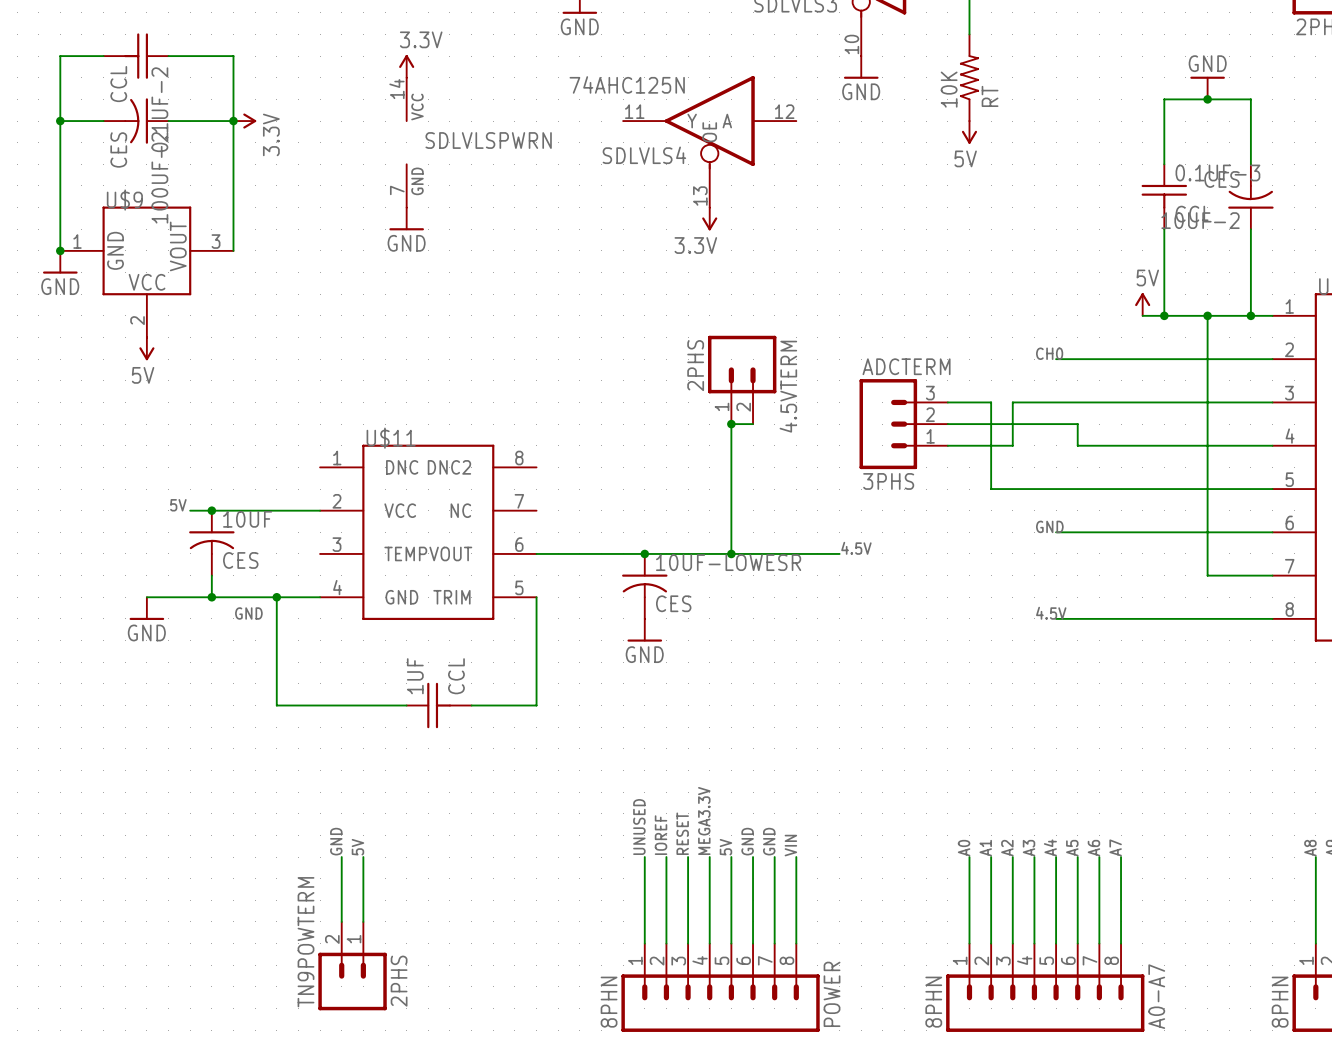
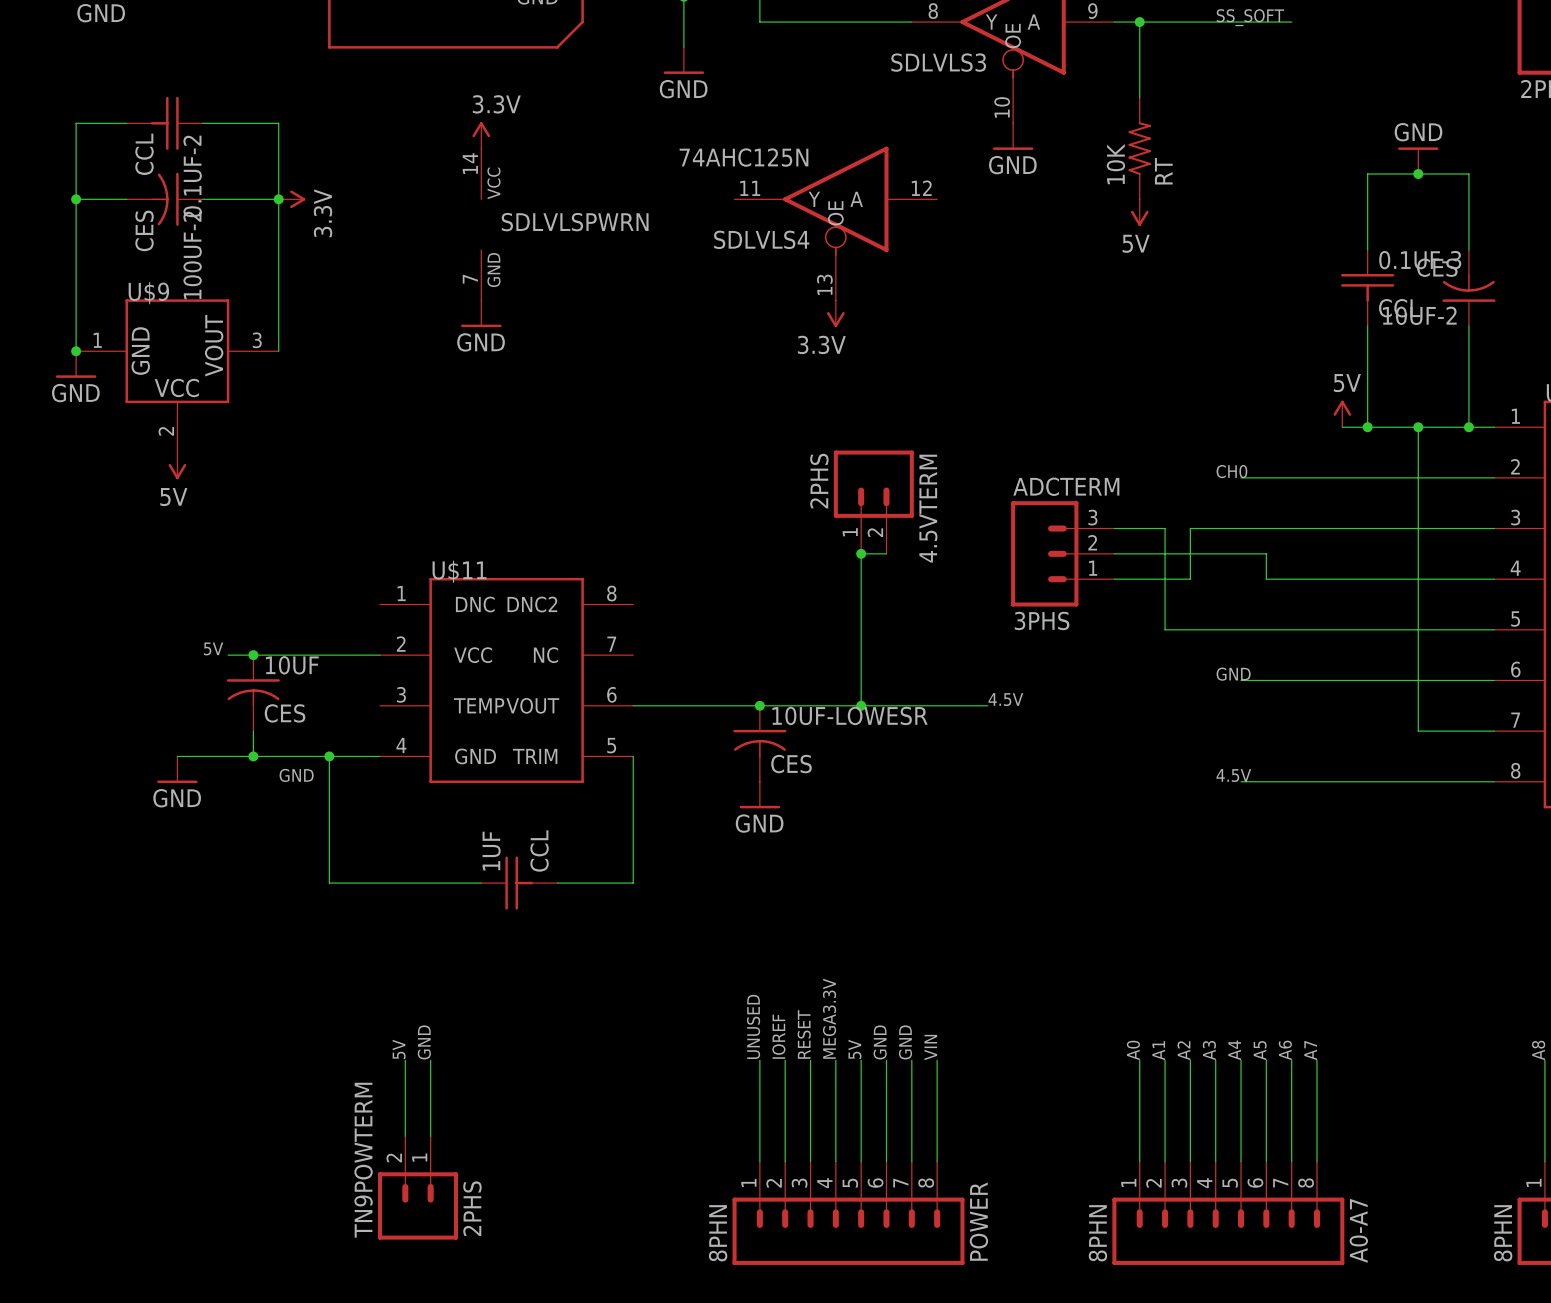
label: GND (336, 841) -> 5V (399, 1049)
label: 5V (357, 847) -> GND (424, 1042)

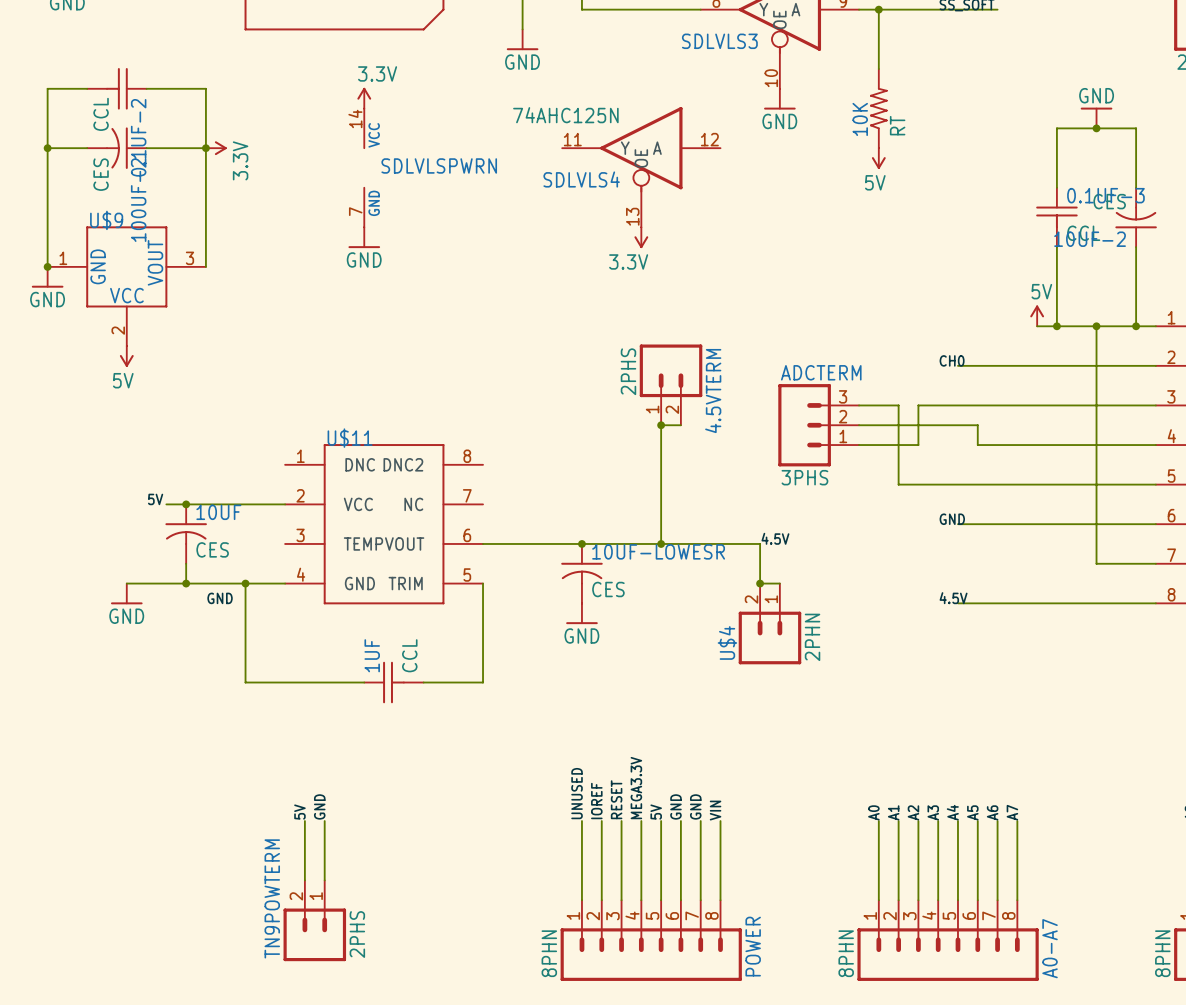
wire: none -> (760, 543) (760, 583) (779, 583)
junction: none -> (760, 583)
U$4: none -> 2PHN (769, 623)

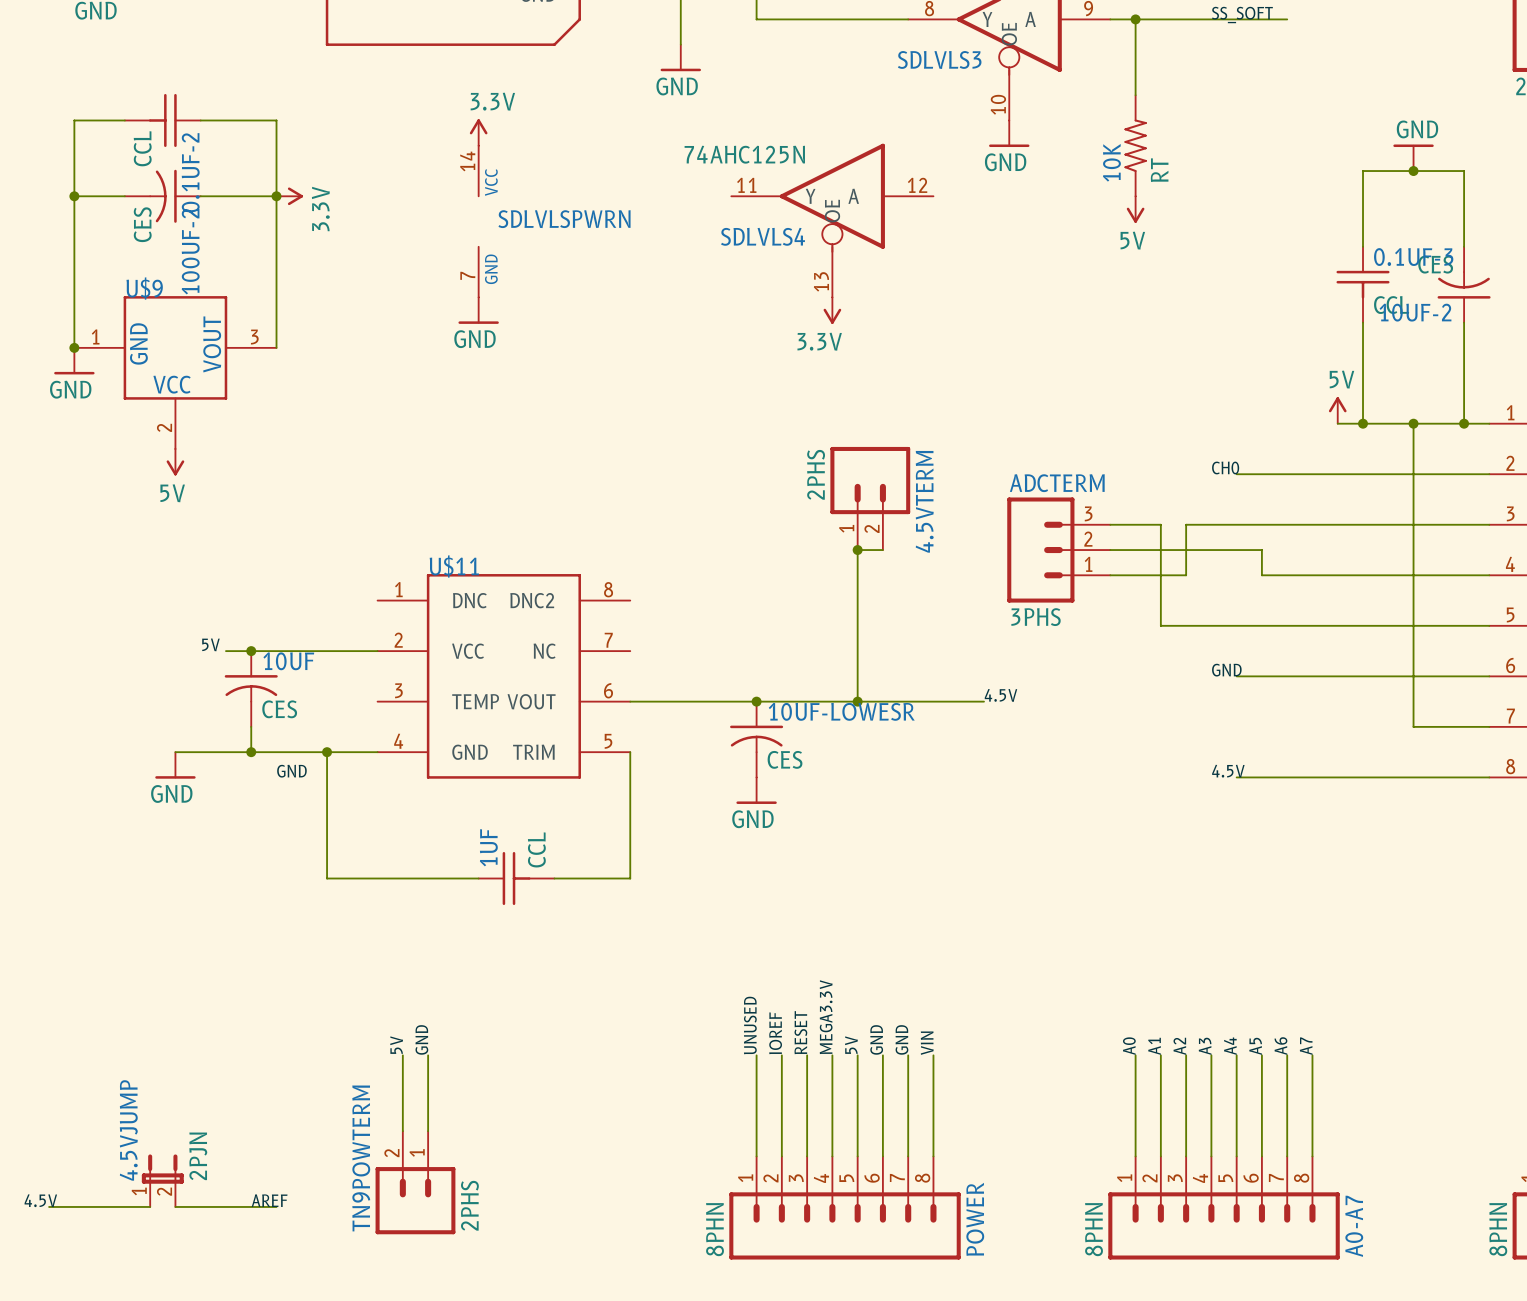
wire: (760, 543) (760, 583) (779, 583) -> none
junction: (760, 583) -> none
U$4: 2PHN (769, 623) -> none
4.5VJUMP: none -> 2PJN (162, 1180)
label: none -> 4.5V (40, 1200)
label: none -> AREF (269, 1200)
wire: none -> (49, 1206) (150, 1206)
wire: none -> (175, 1206) (276, 1206)

